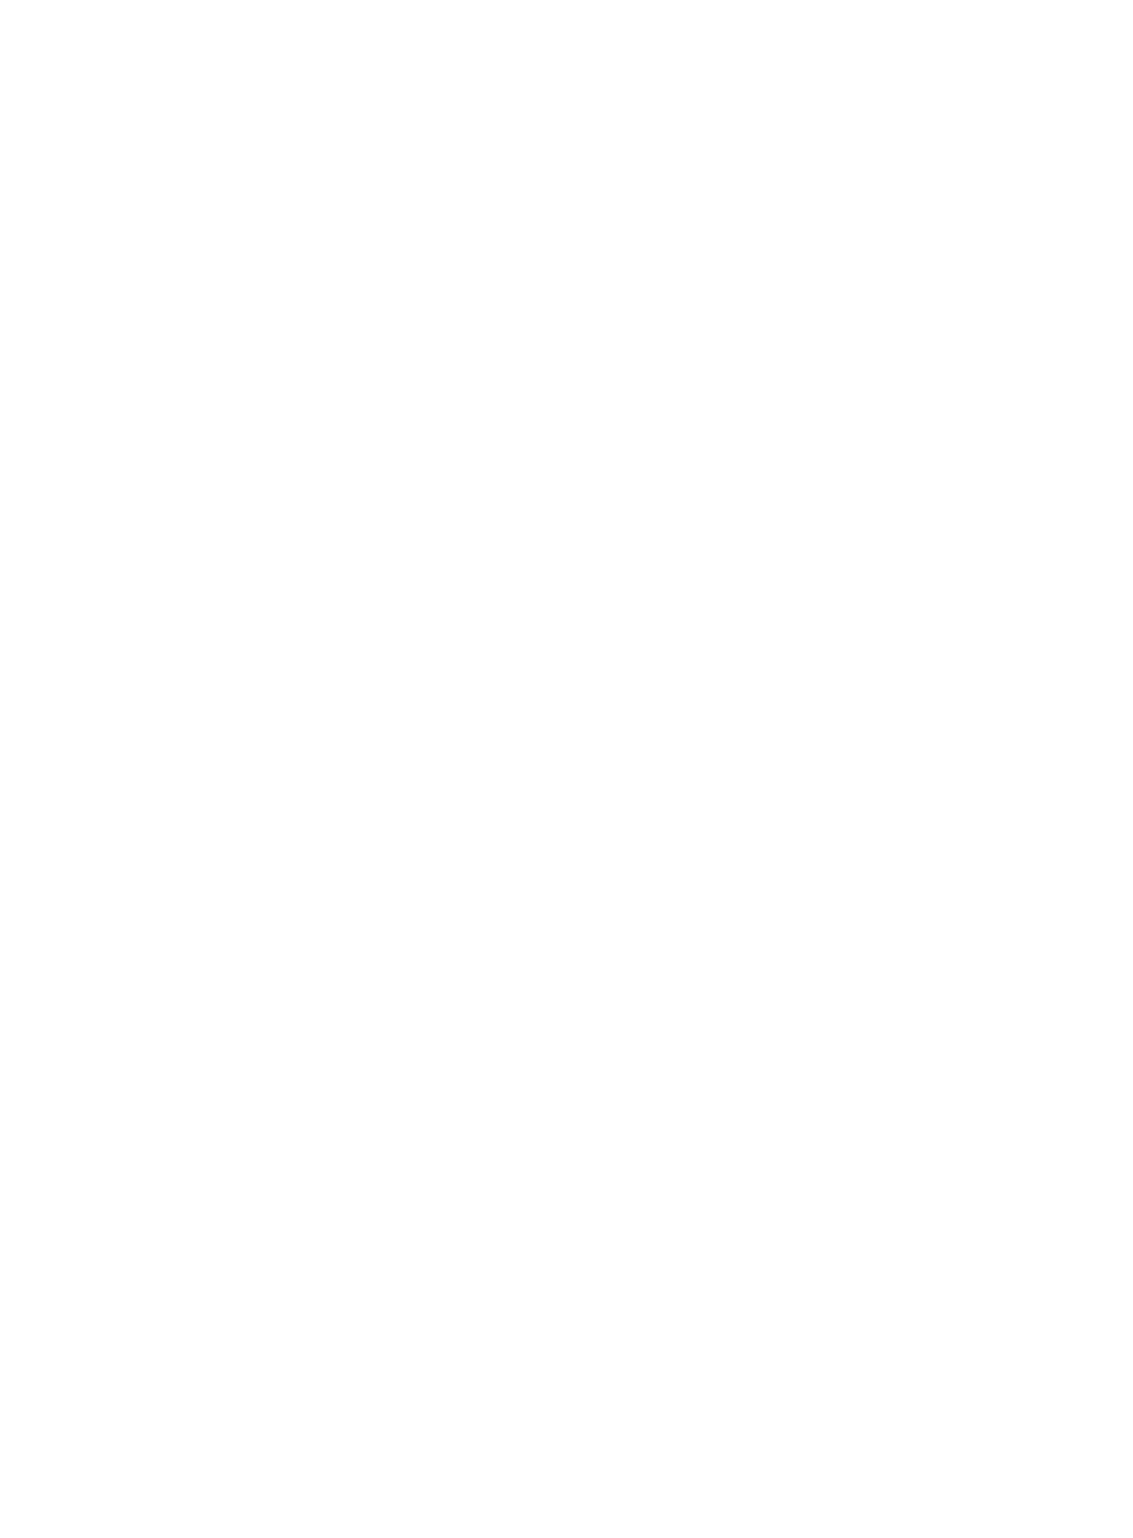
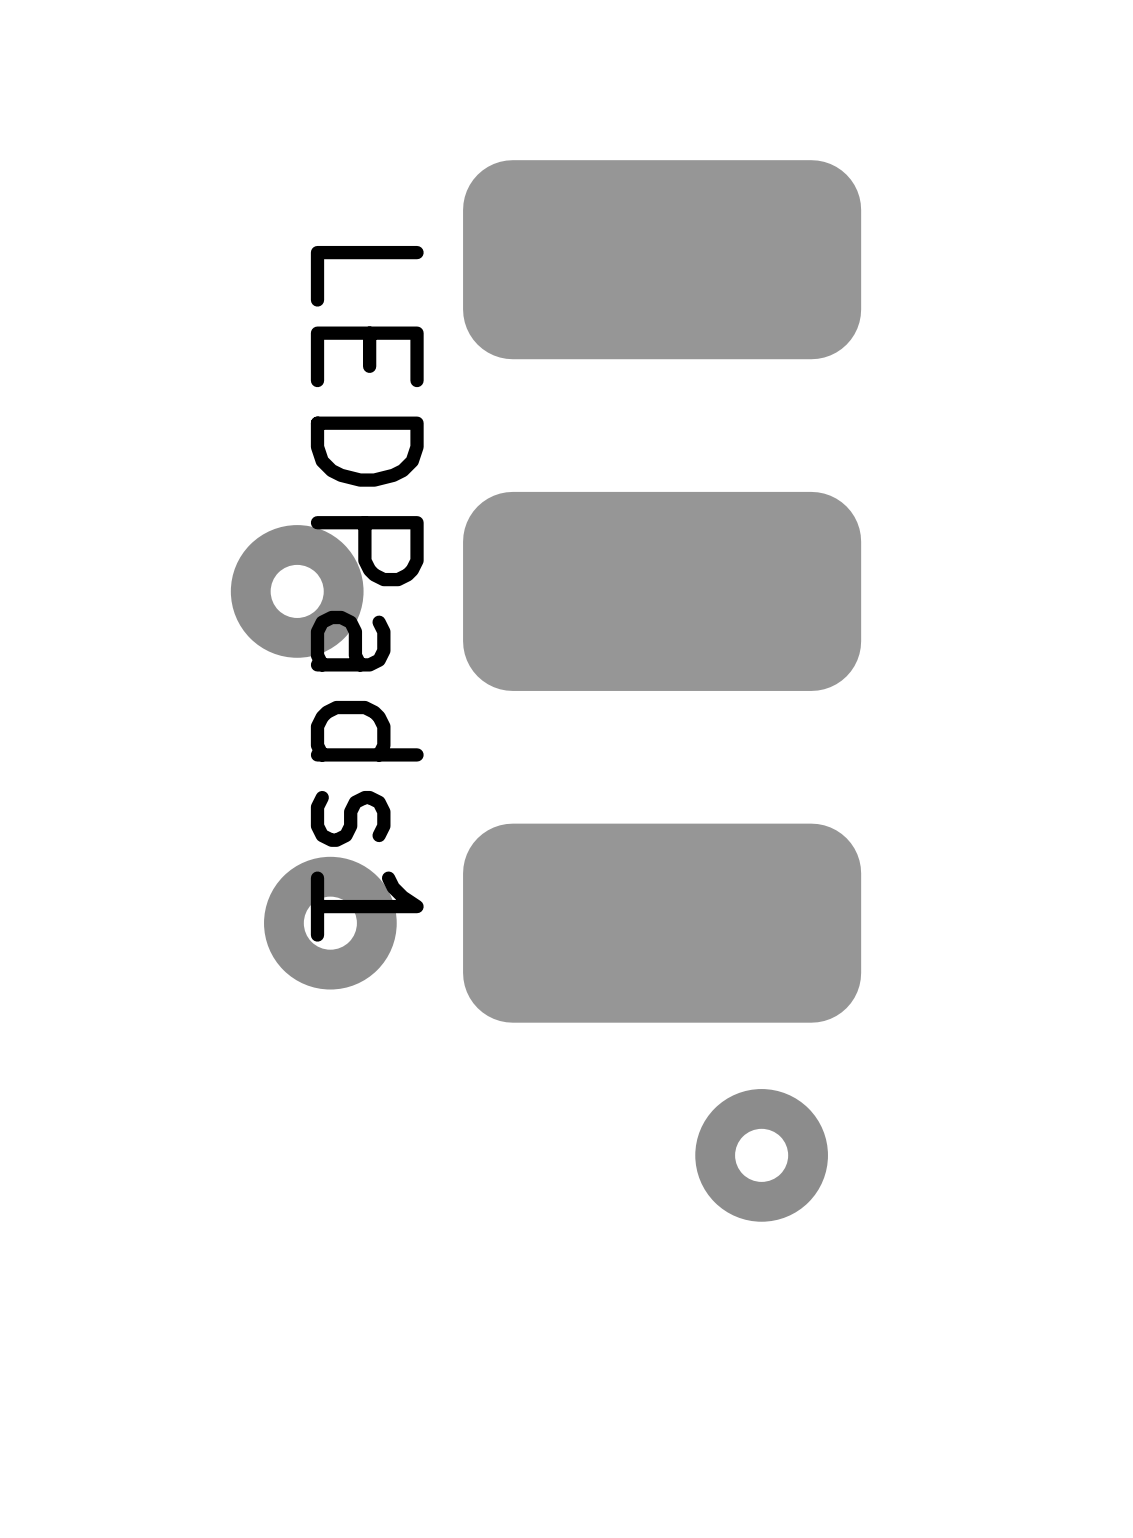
via: none -> (297, 591)
LEDPads1: none -> (662, 591)
via: none -> (330, 923)
via: none -> (761, 1155)

